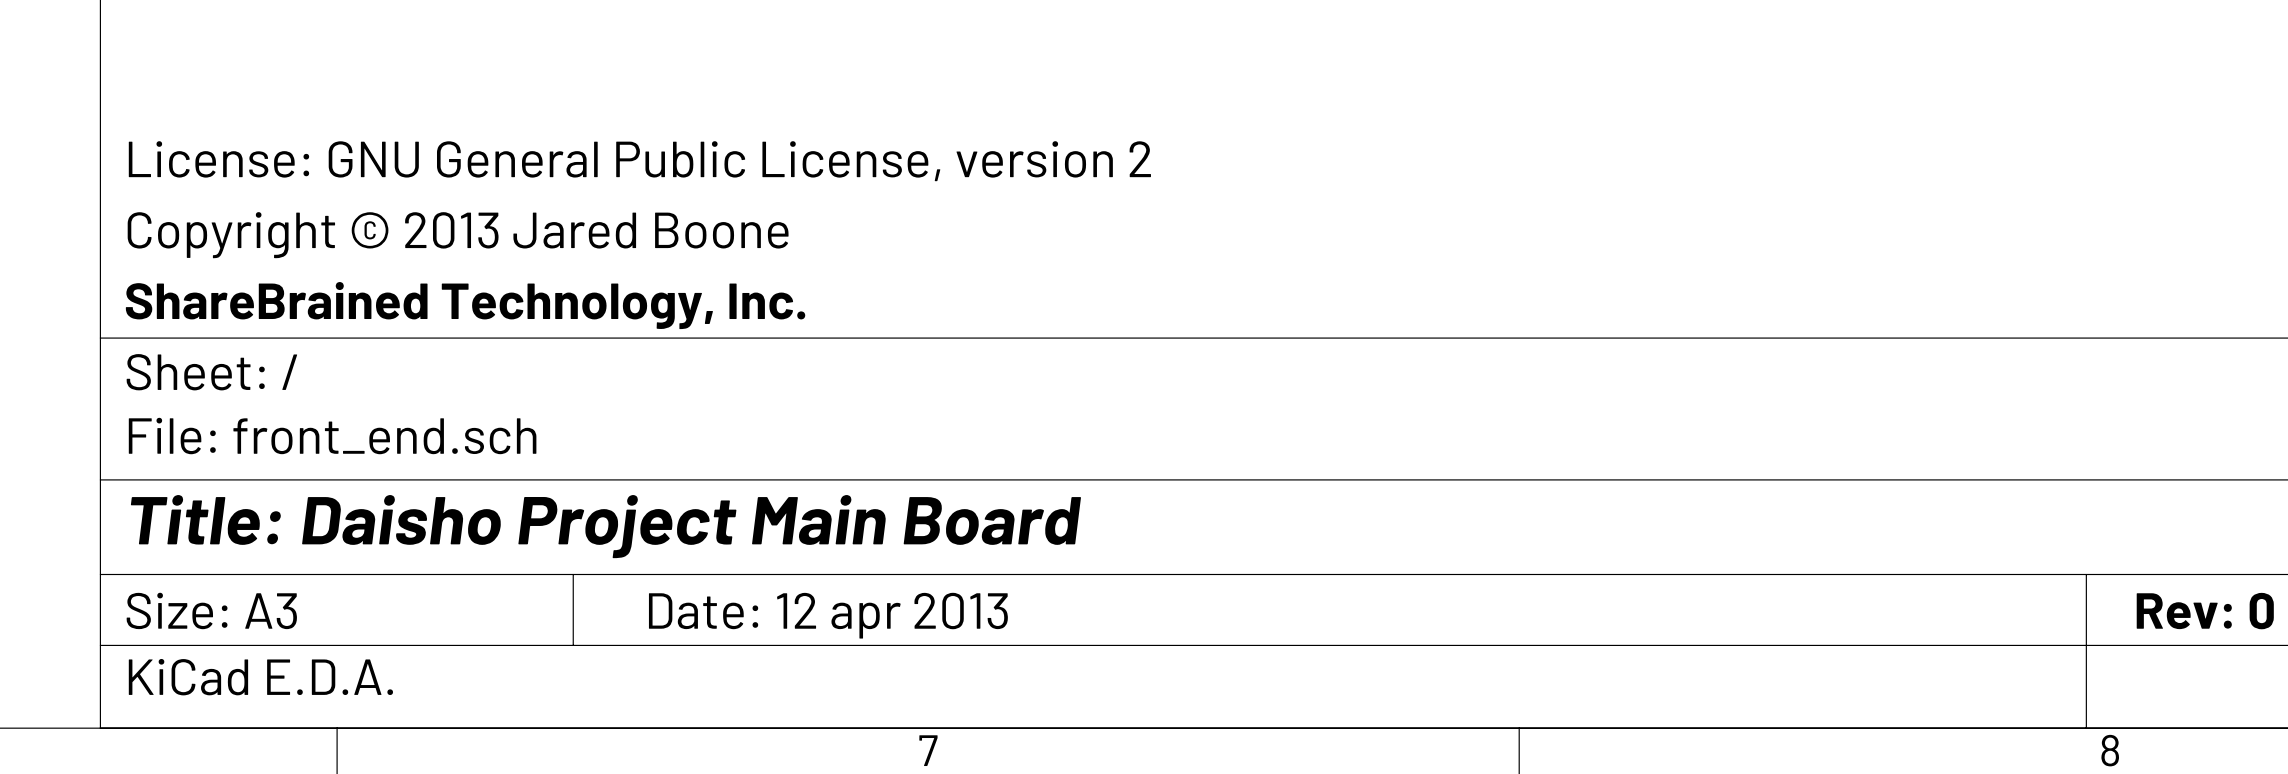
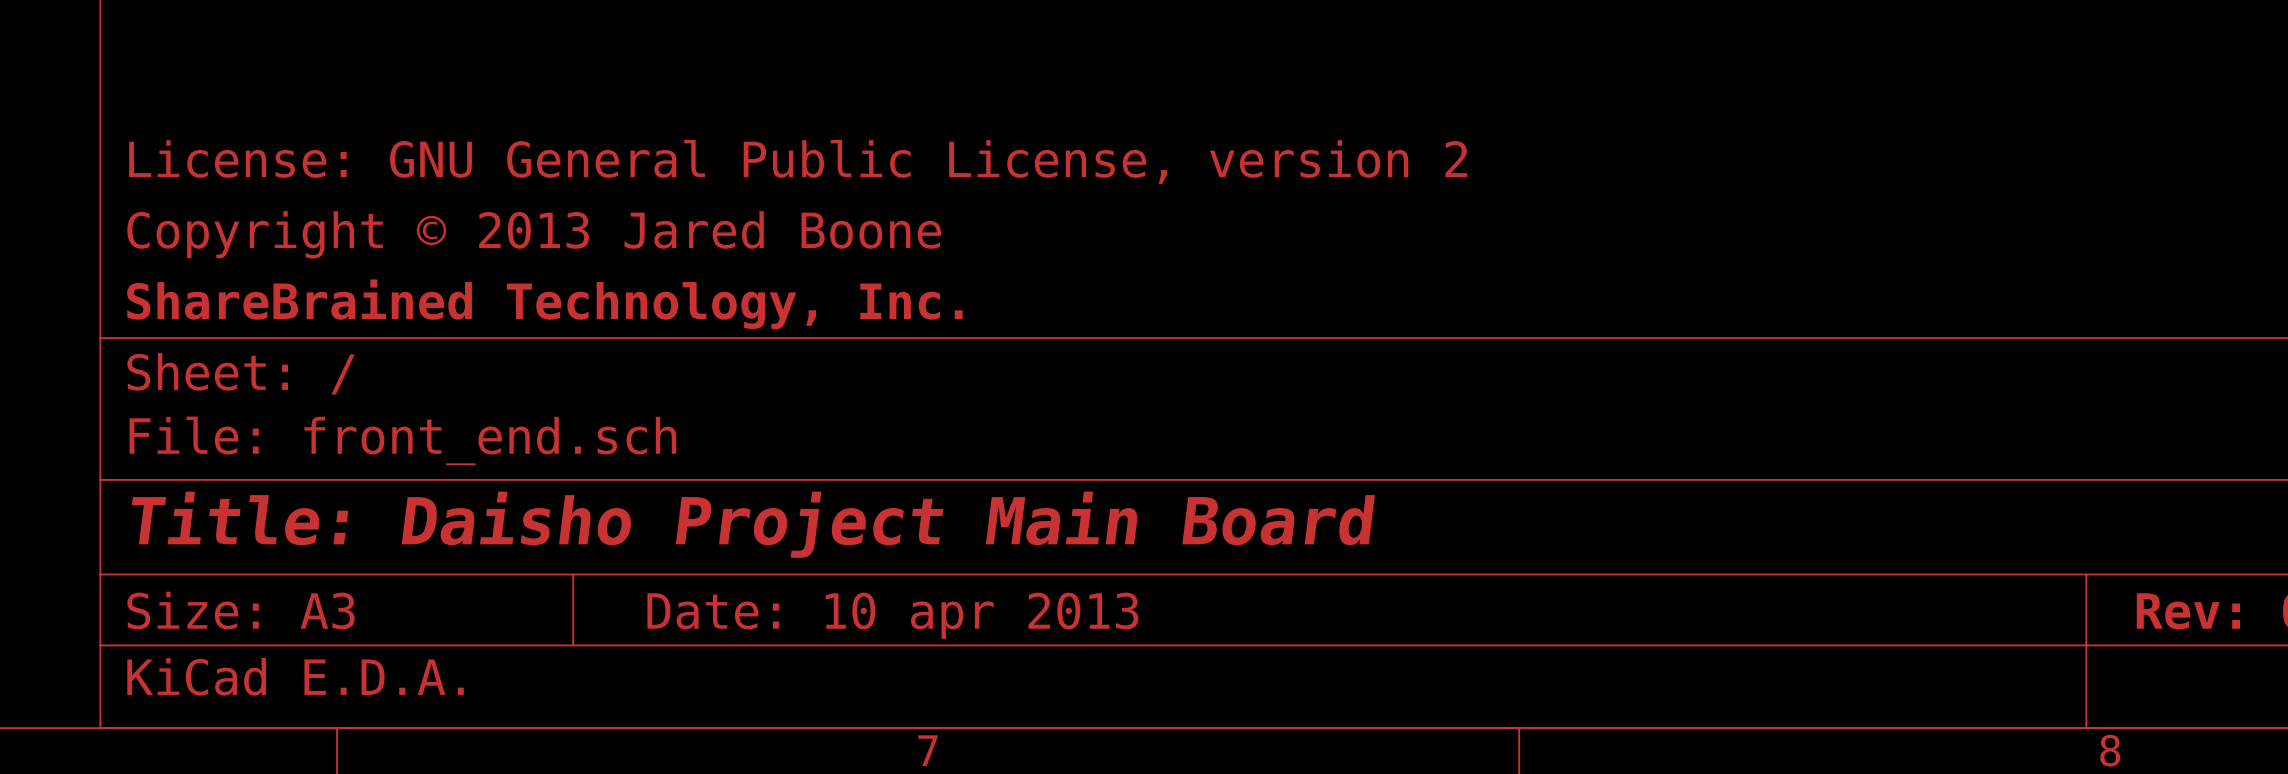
title block: Date: 12 apr 2013 (828, 615) -> Date: 10 apr 2013 (892, 615)

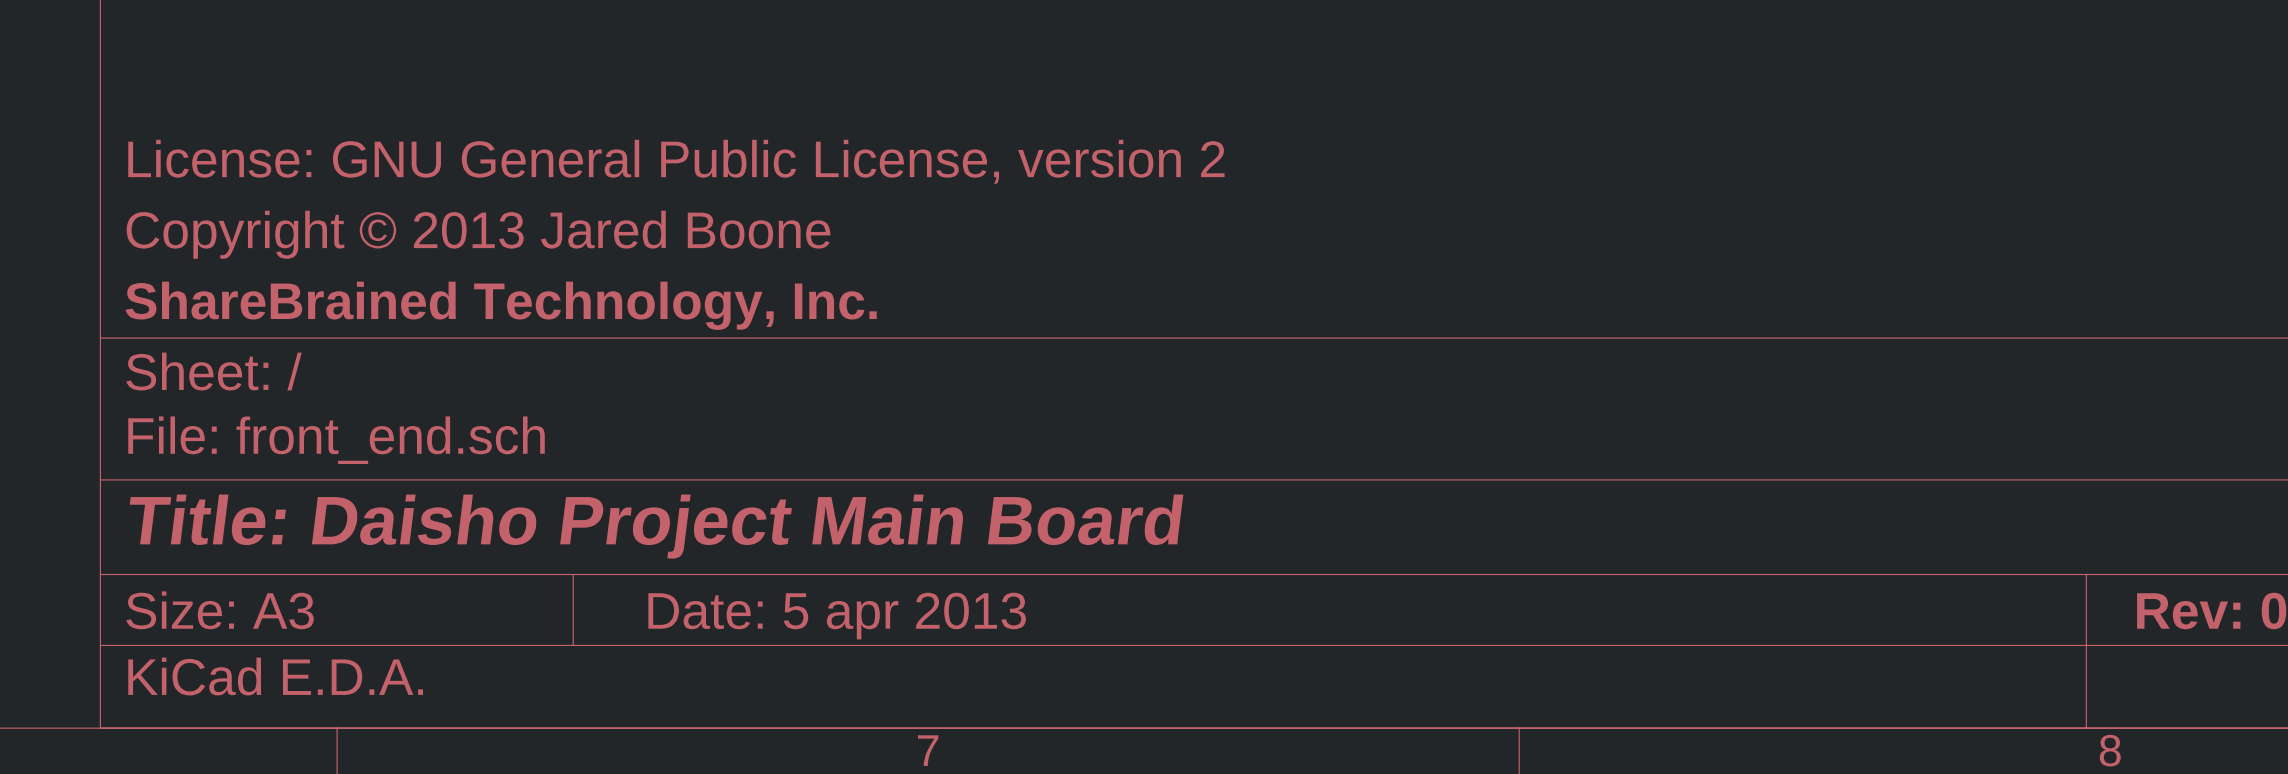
title block: Date: 10 apr 2013 (892, 615) -> Date: 5 apr 2013 (837, 616)

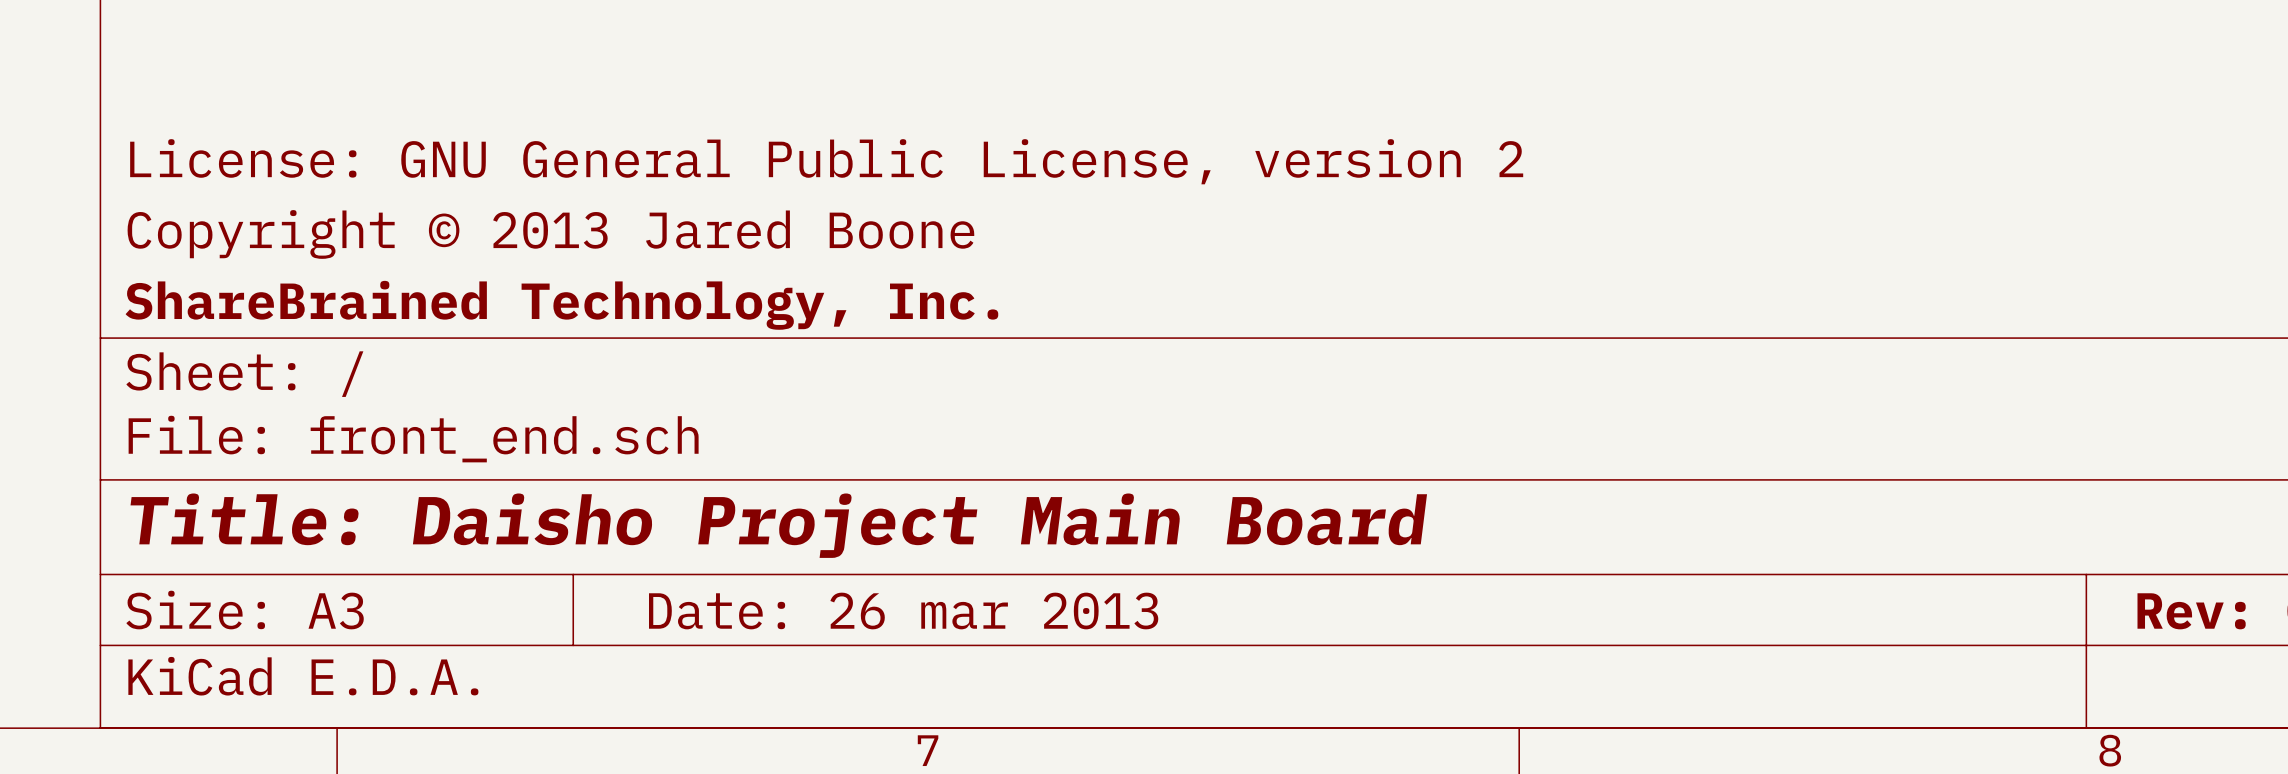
title block: Date: 5 apr 2013 (837, 616) -> Date: 26 mar 2013 (903, 610)

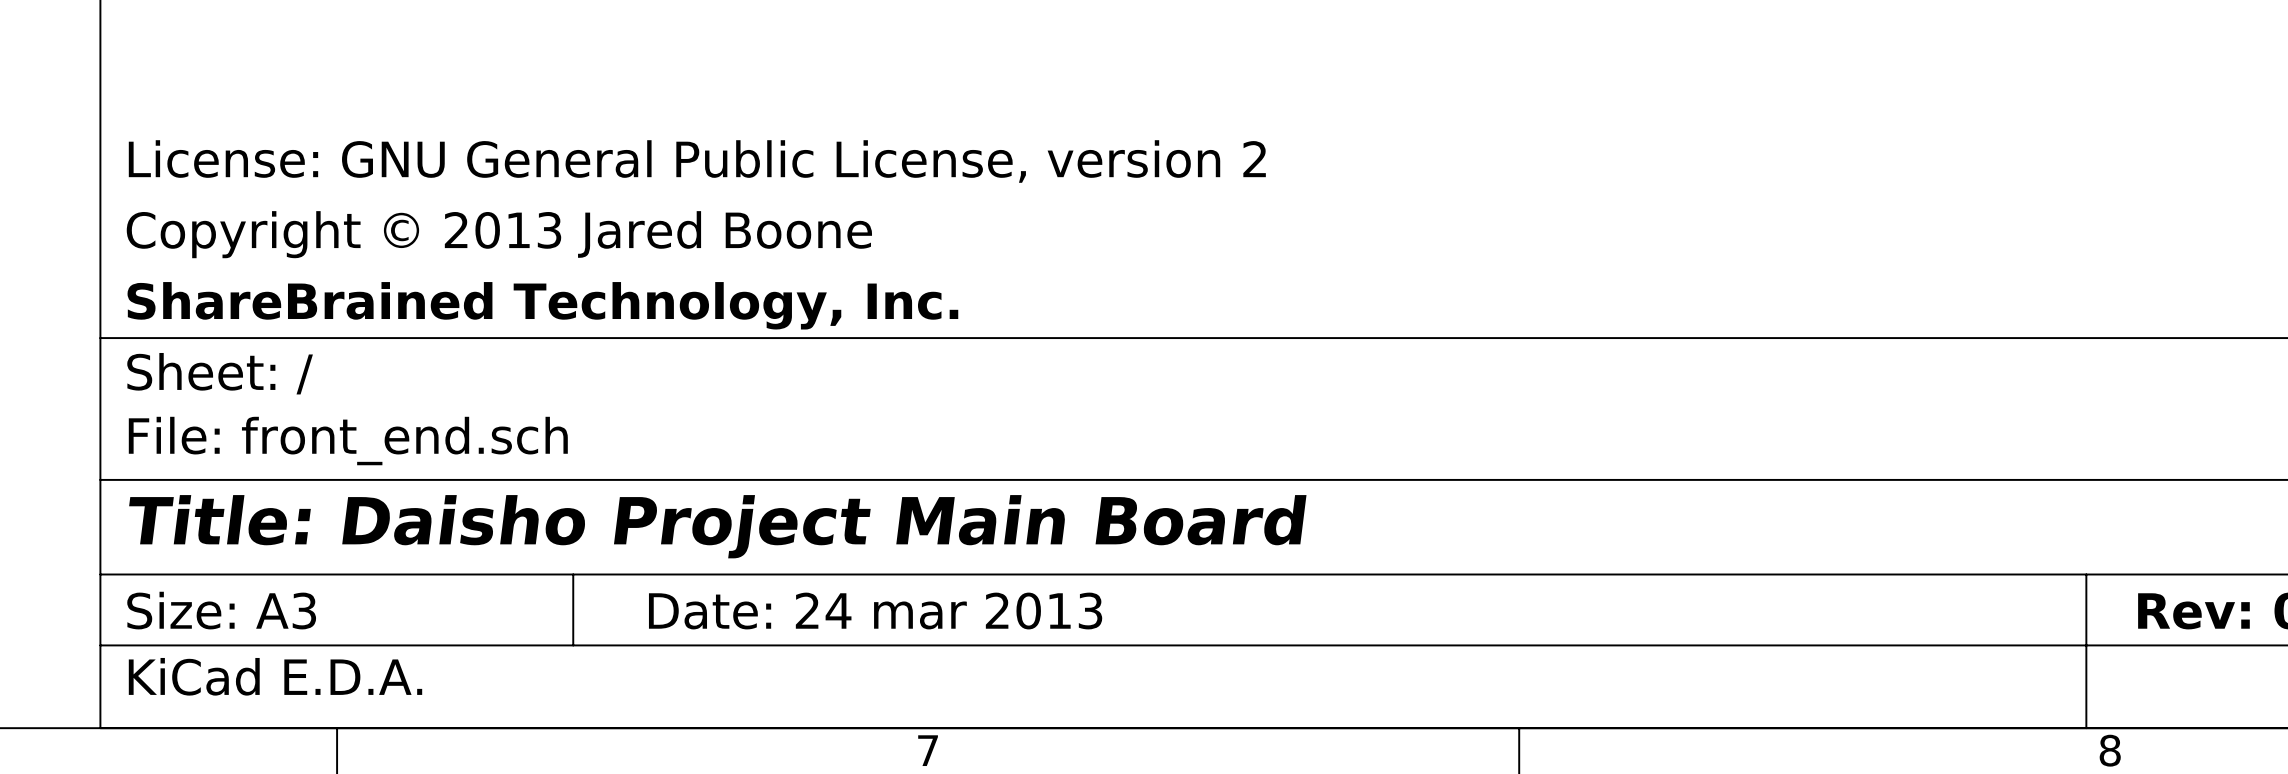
title block: Date: 26 mar 2013 (903, 610) -> Date: 24 mar 2013 (875, 611)

